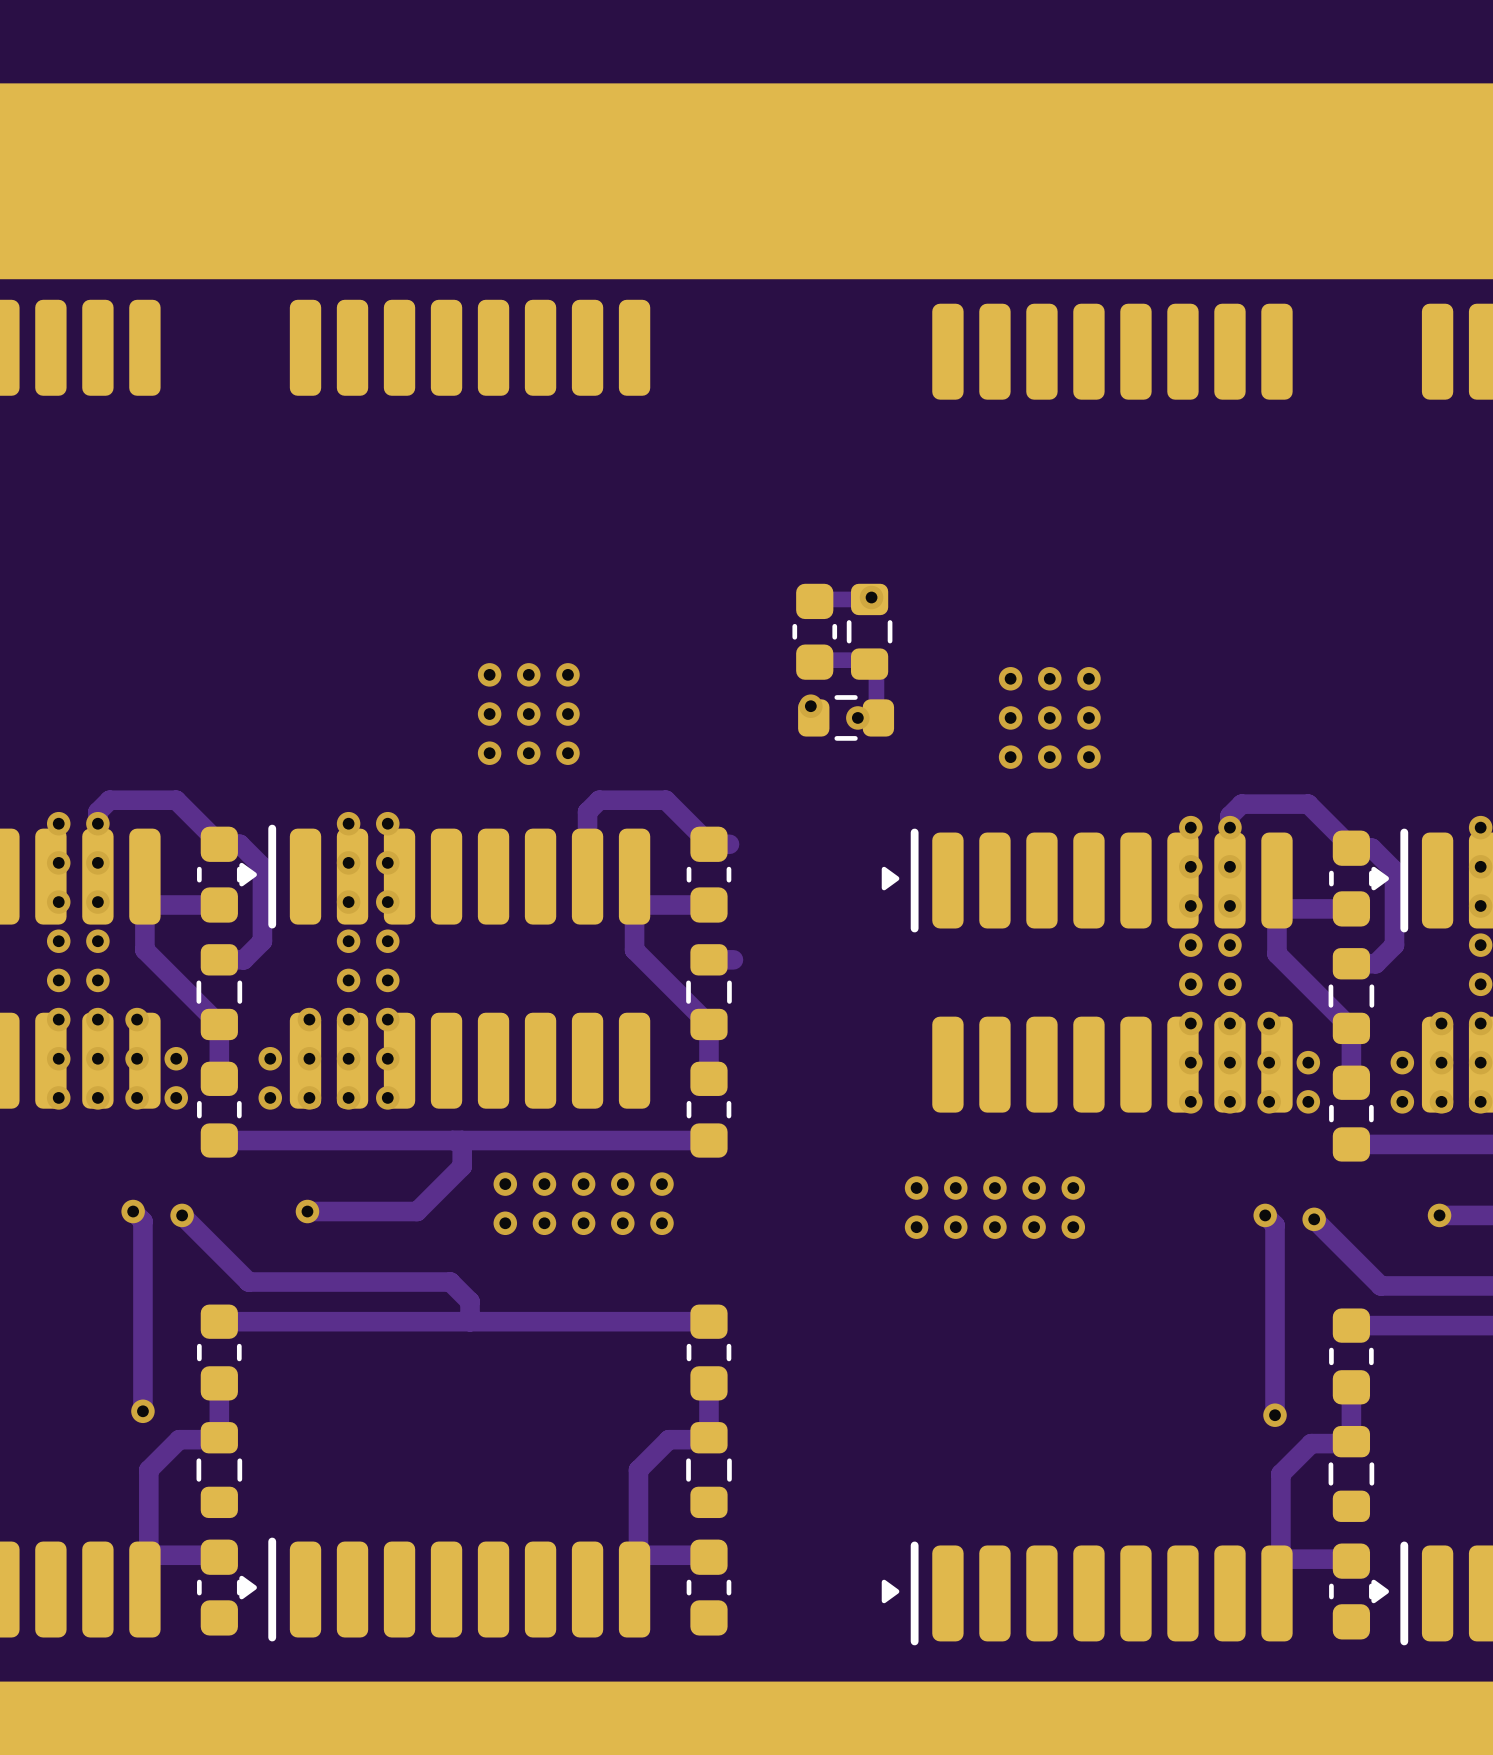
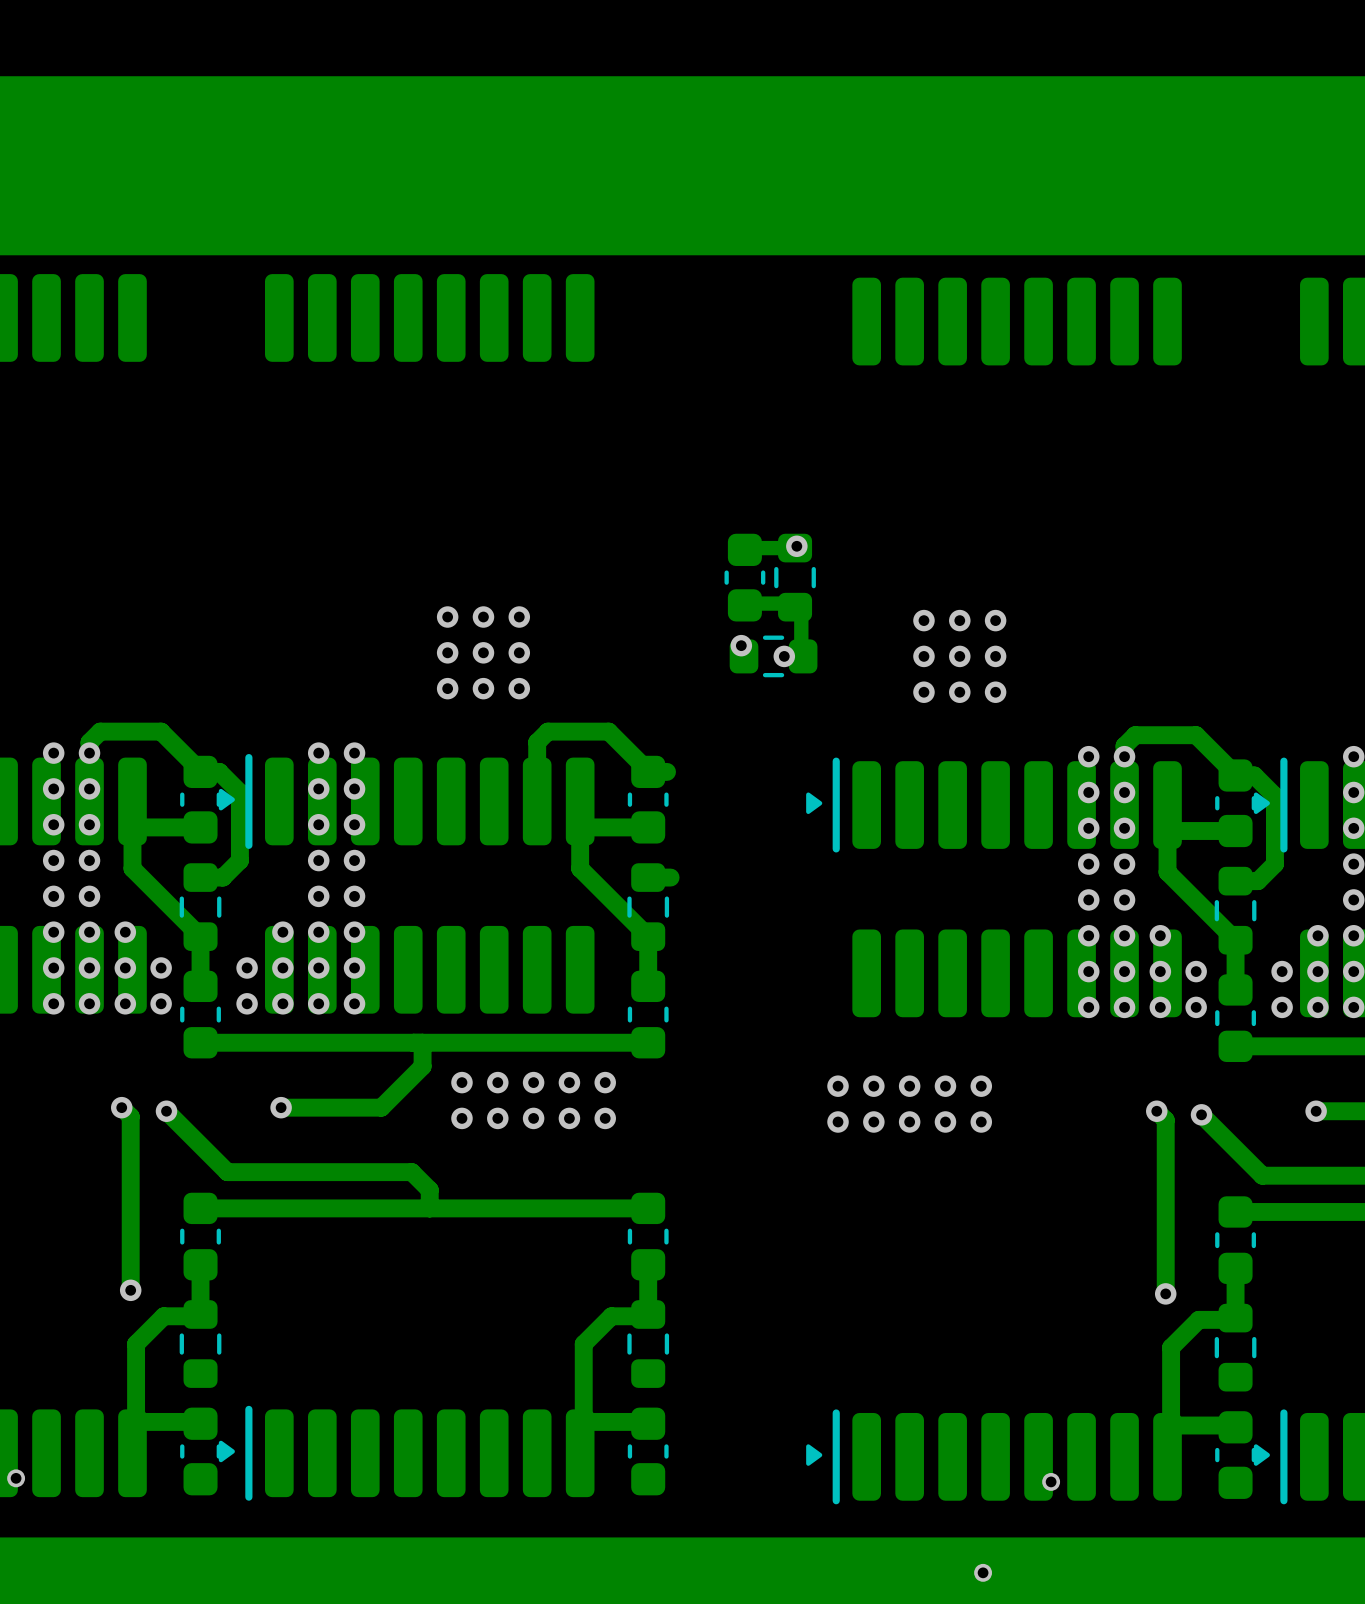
via: none -> (16, 1478)
via: none -> (1051, 1481)
via: none -> (983, 1572)

